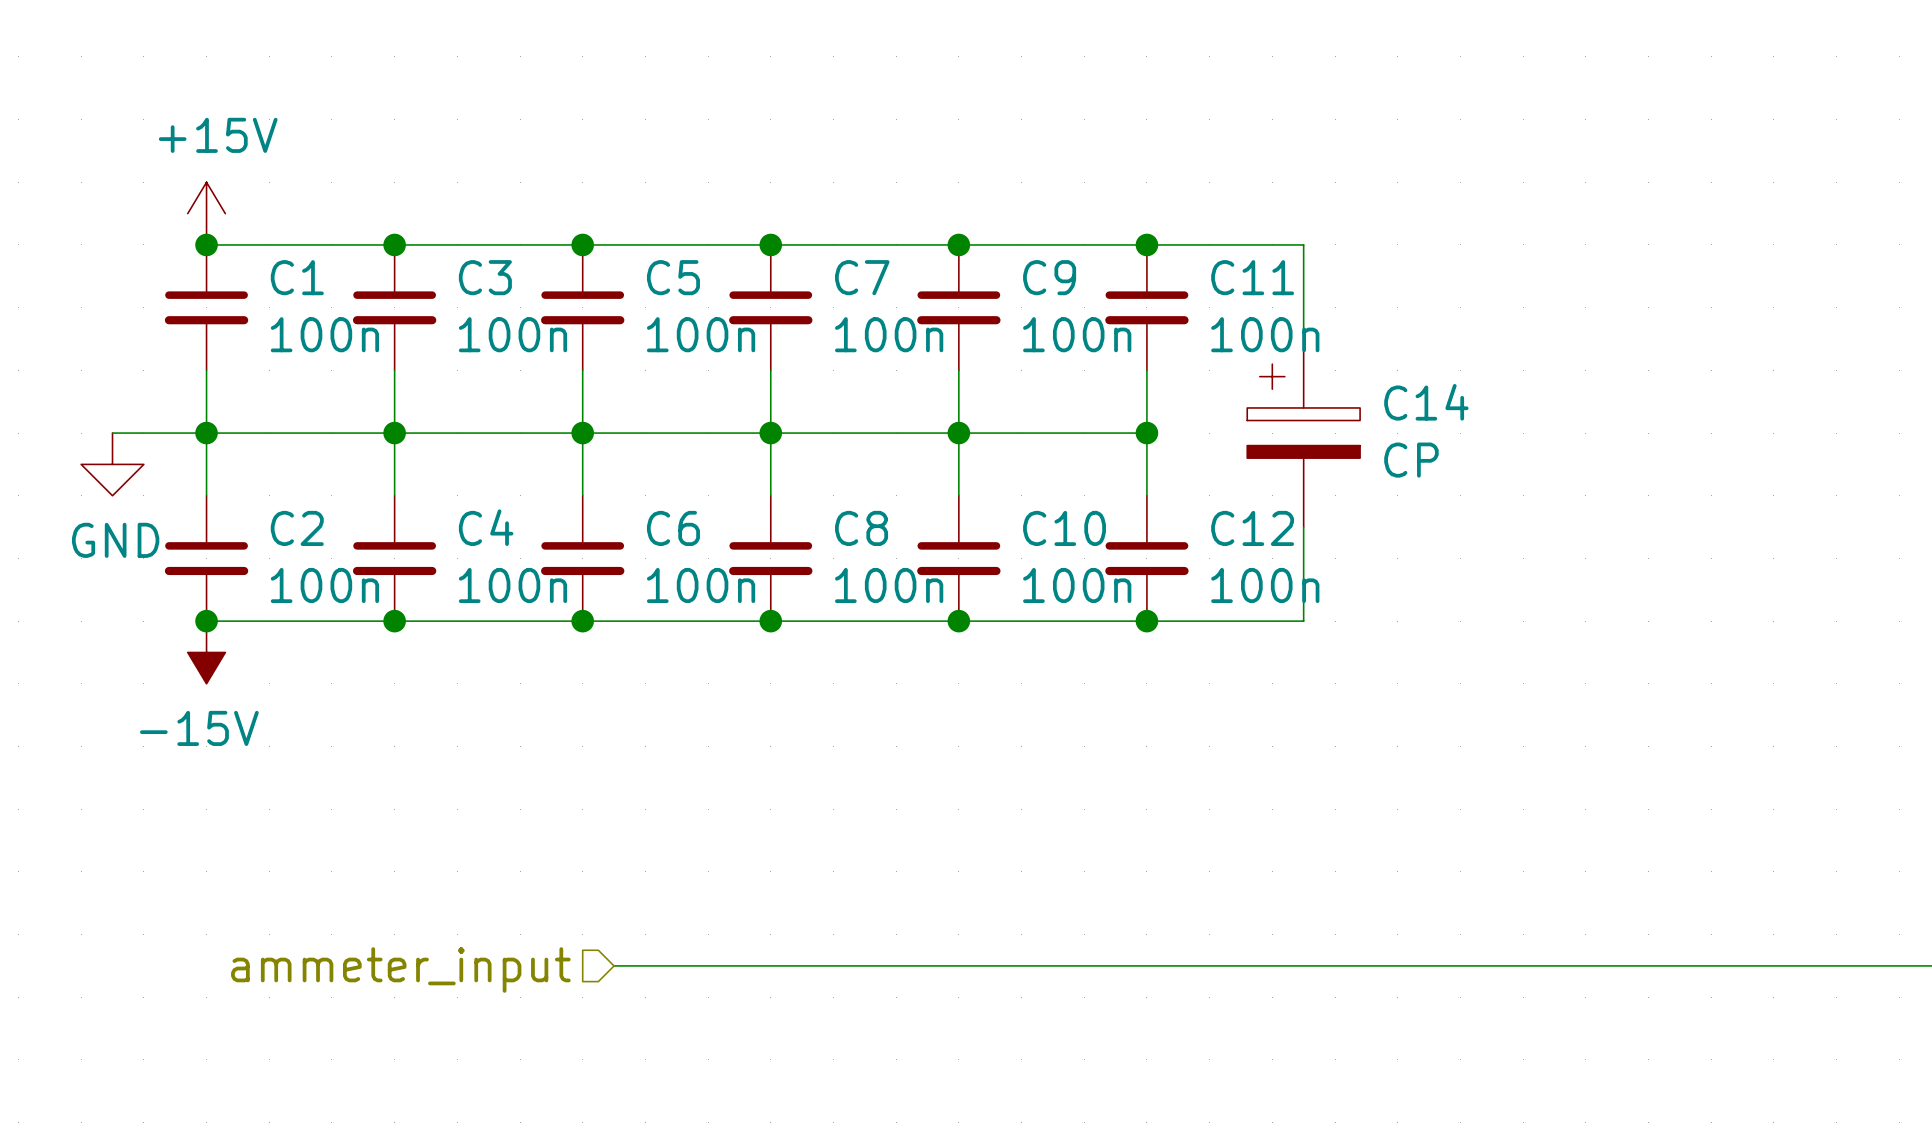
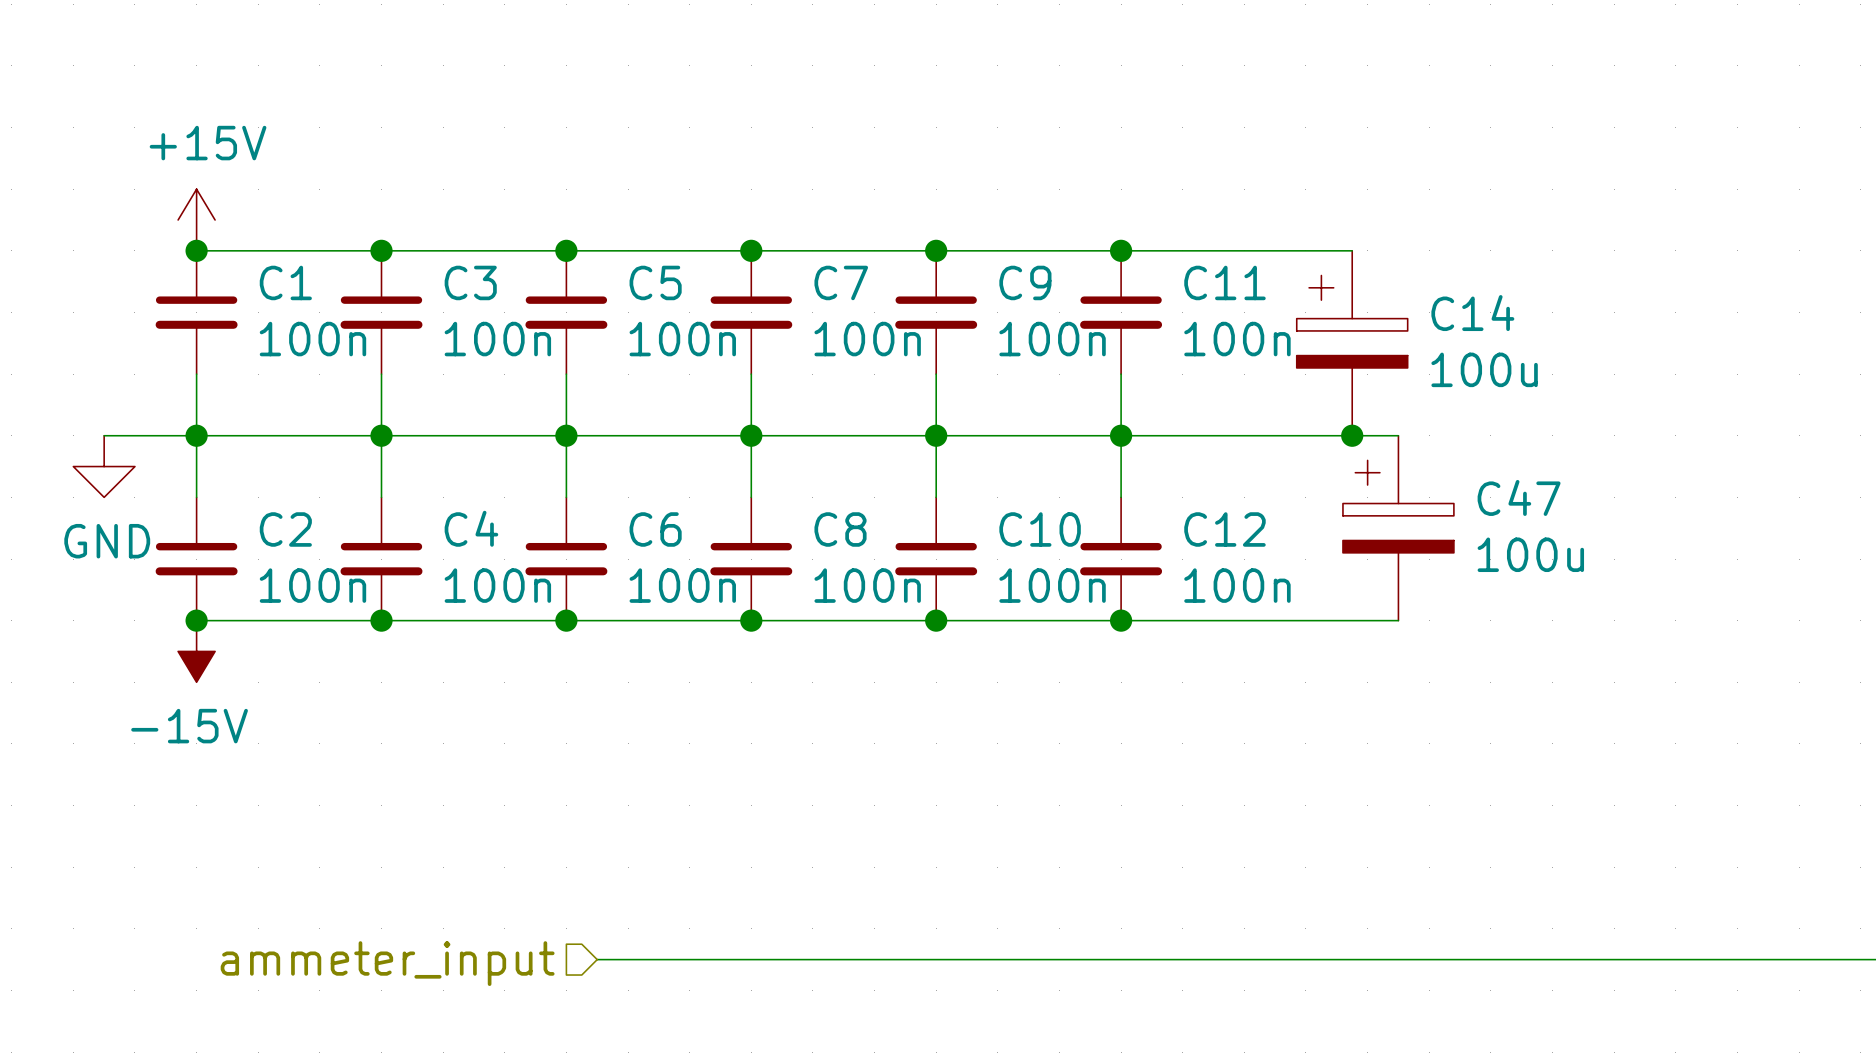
wire: (1303, 244) (1303, 339) -> (1275, 250) (1352, 250)
wire: none -> (1121, 435) (1398, 435)
C14 position: (1303, 433) -> (1352, 343)
junction: none -> (1352, 435)
C14 value: CP (1411, 460) -> 100u (1484, 369)
wire: (1303, 527) (1303, 621) -> (1398, 620) (1275, 620)
C47: none -> 100u (1398, 528)

